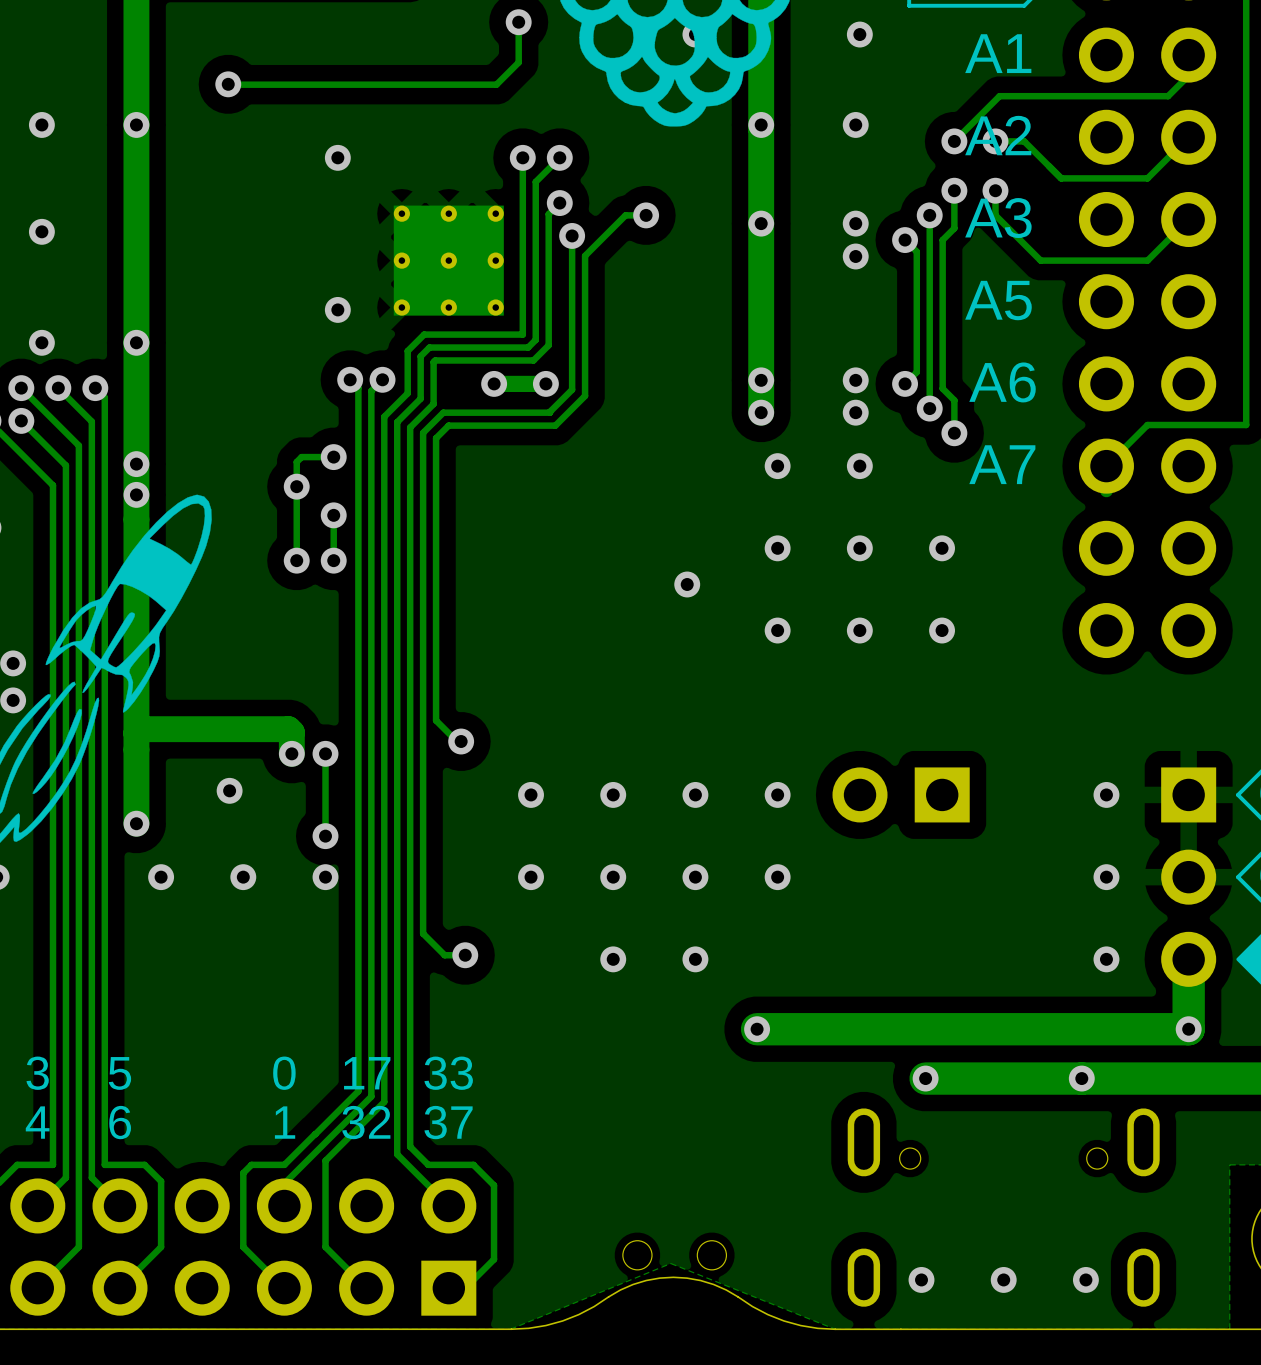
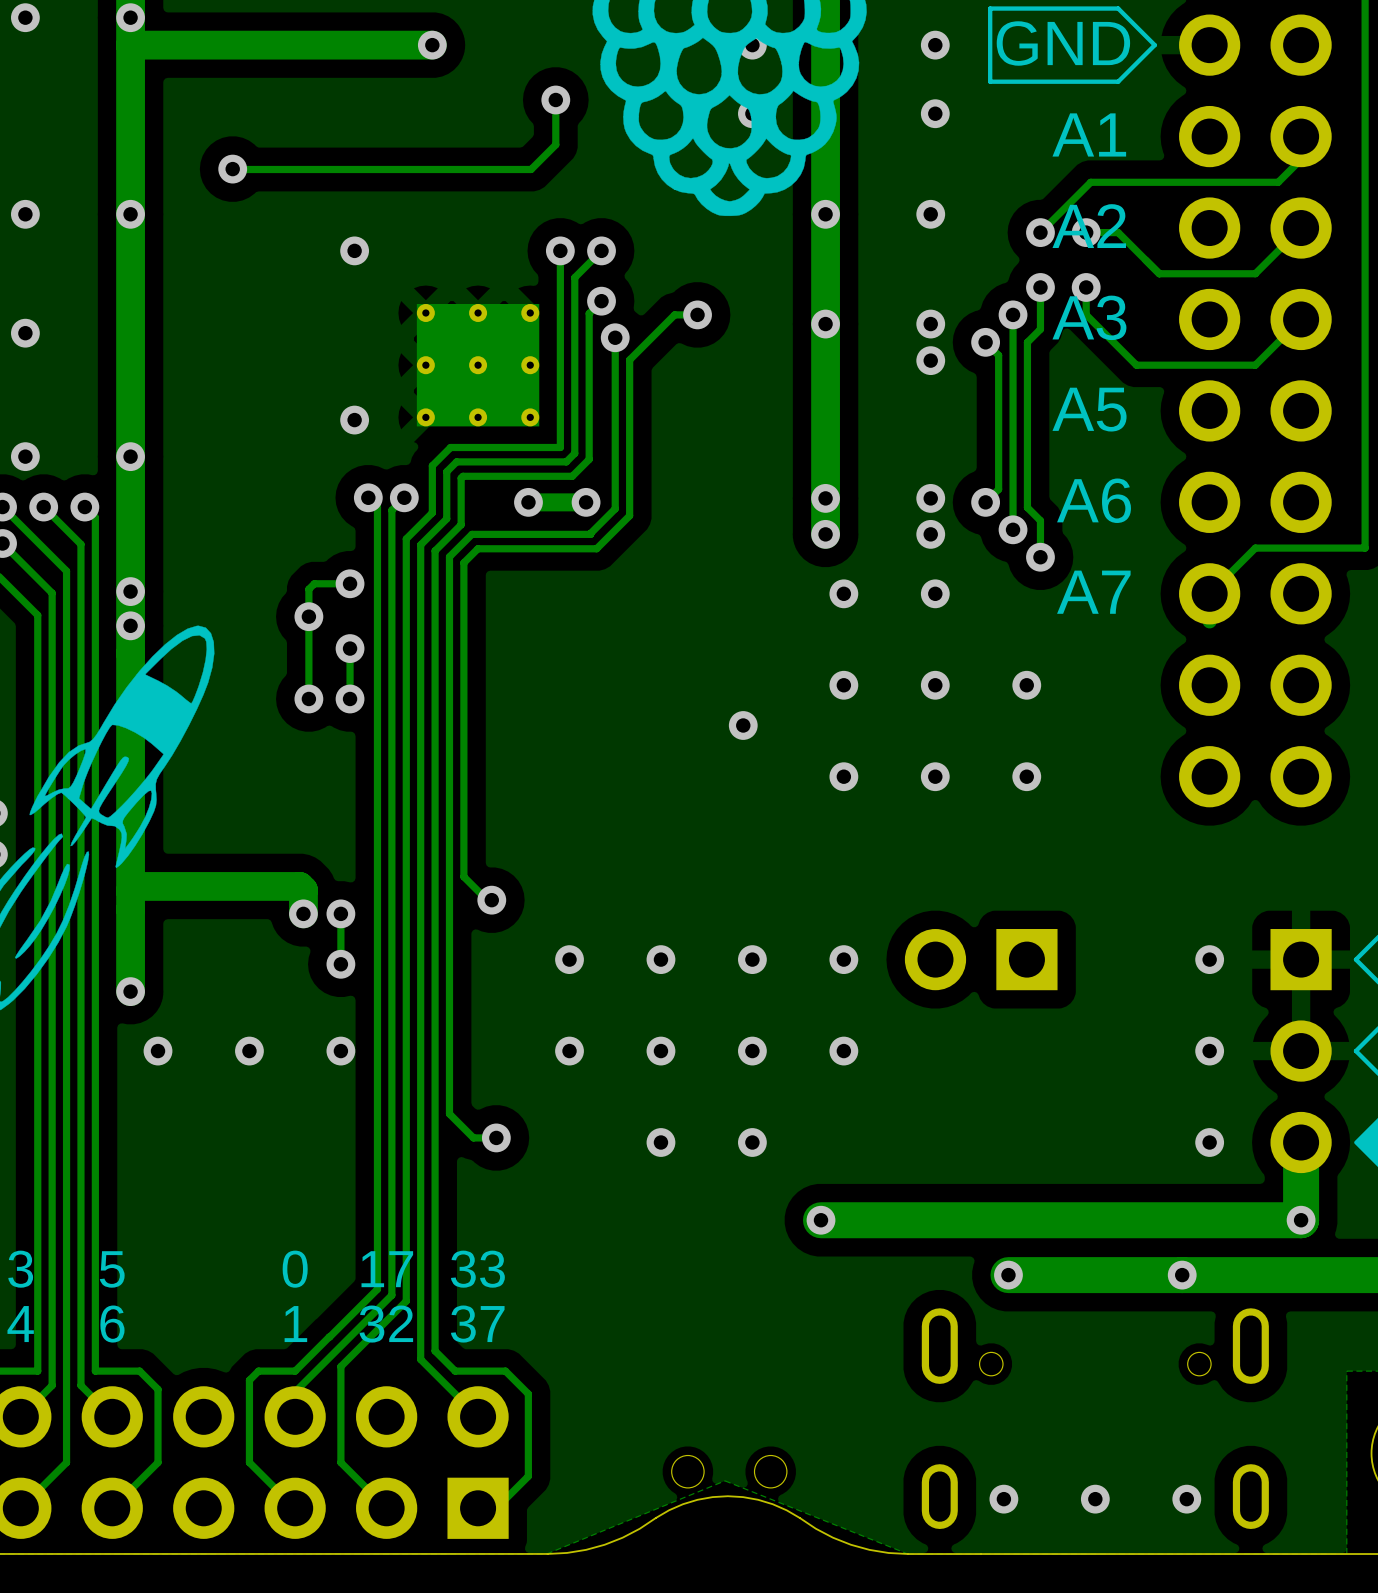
via: (229, 790) -> none
track: (325, 799) (325, 836) -> none
via position: (325, 836) -> (340, 964)

